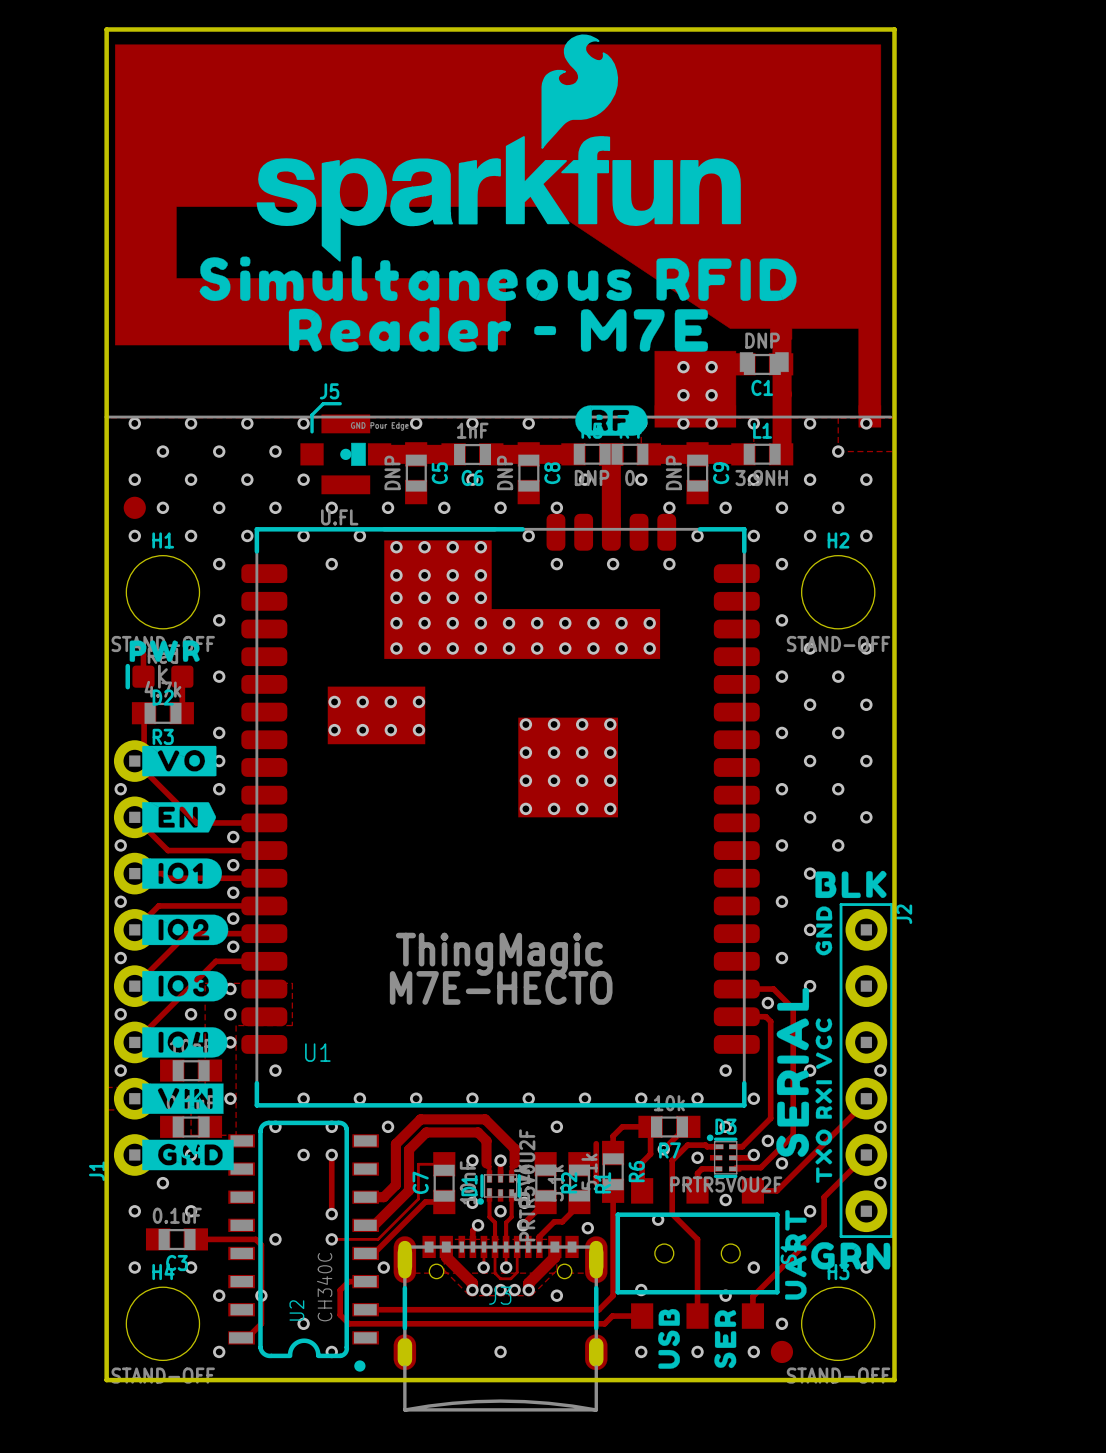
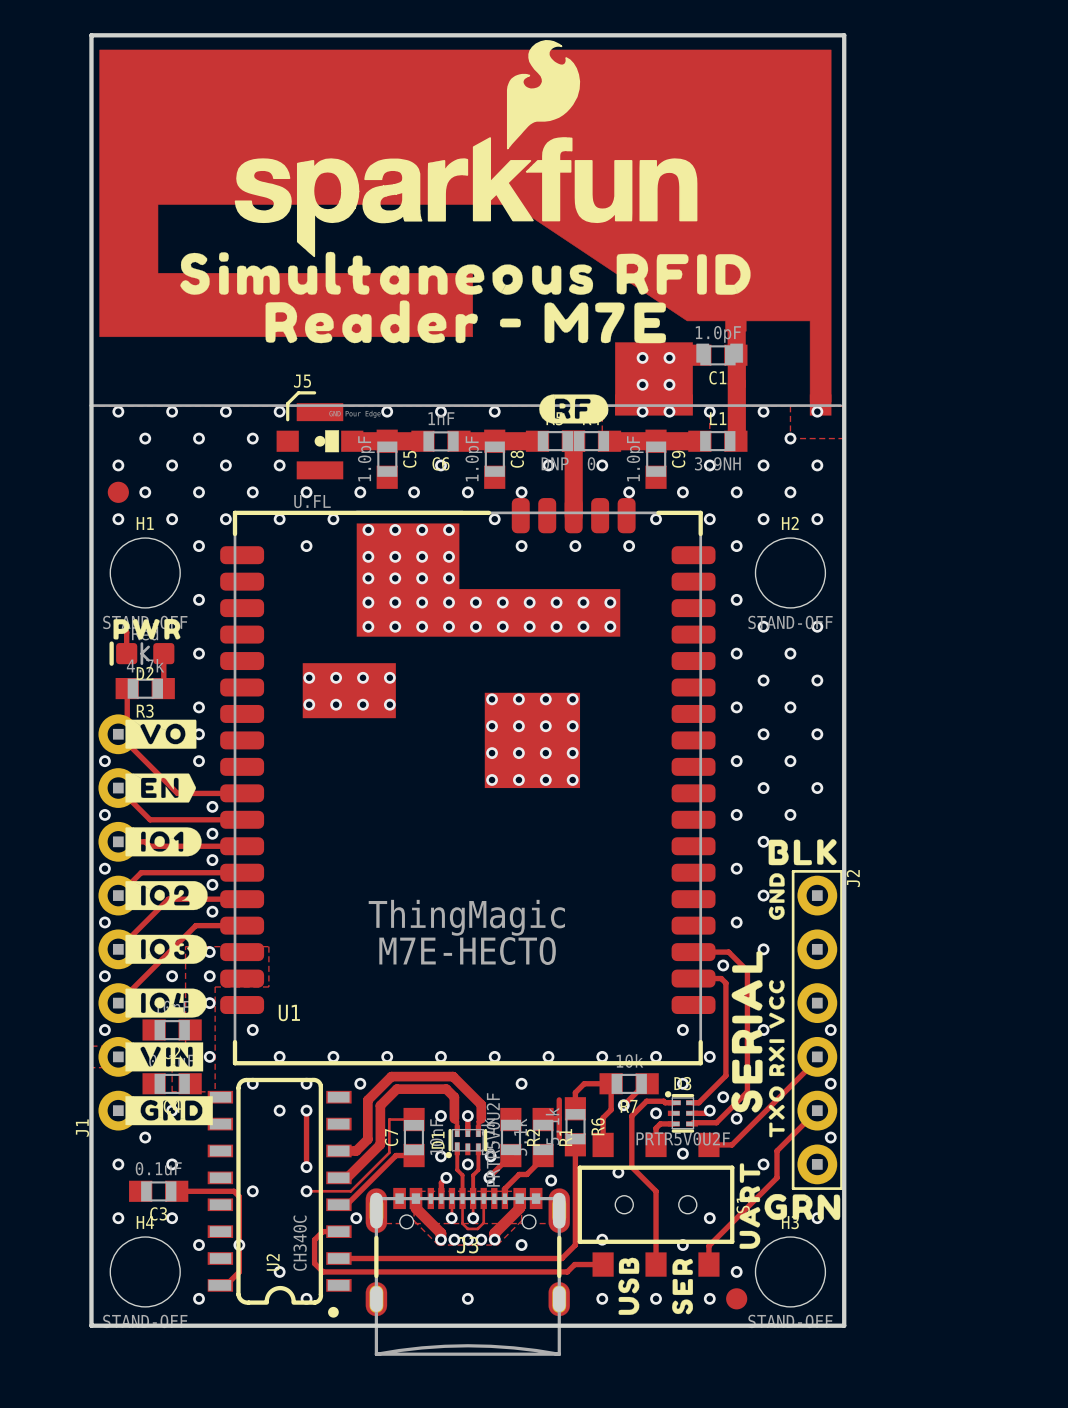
C1 value: DNP (762, 340) -> 1.0pF (718, 334)
C5 value: DNP (392, 472) -> 1.0pF (366, 458)
C8 value: DNP (505, 472) -> 1.0pF (473, 458)
C9 value: DNP (673, 472) -> 1.0pF (635, 458)

